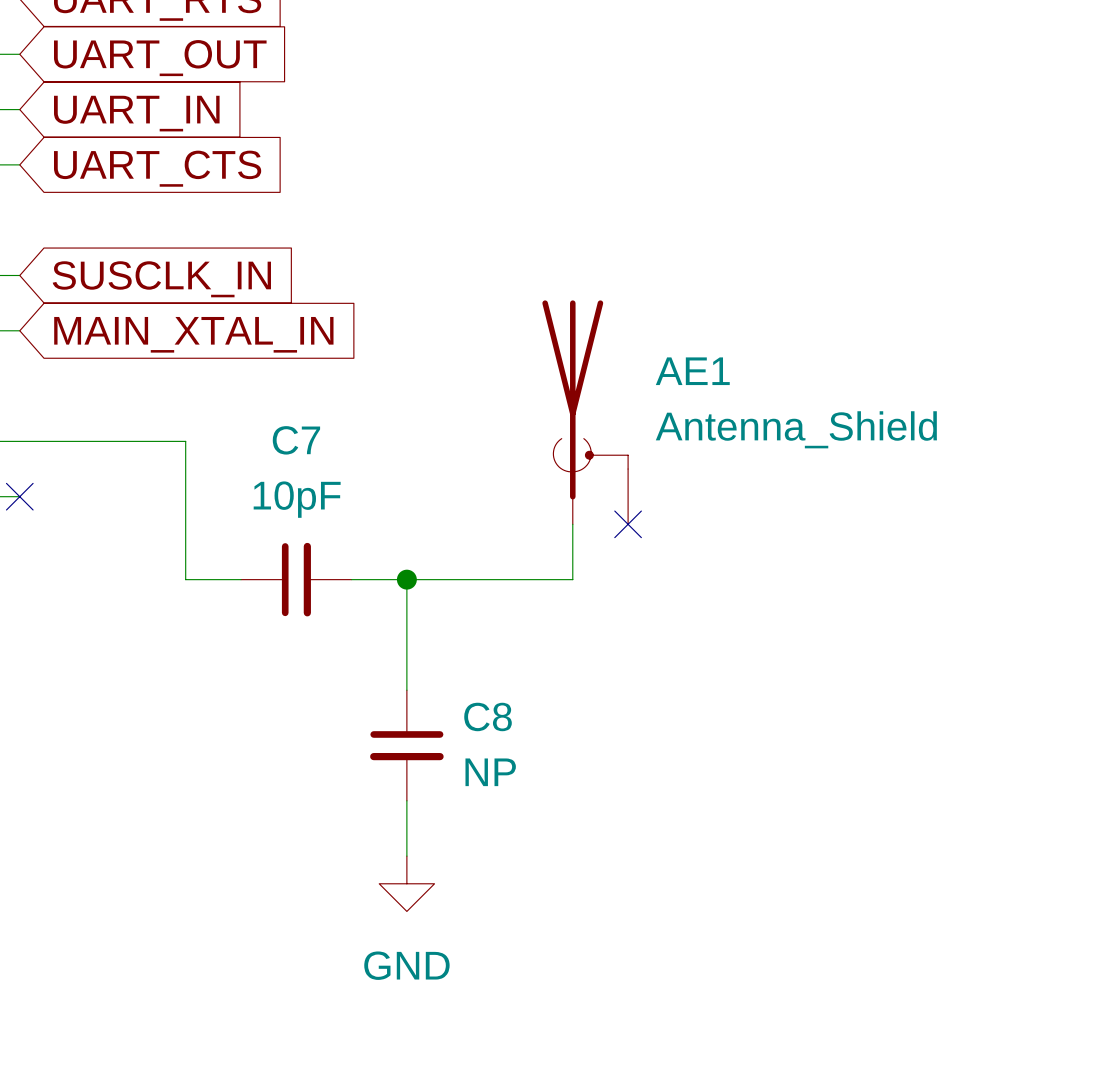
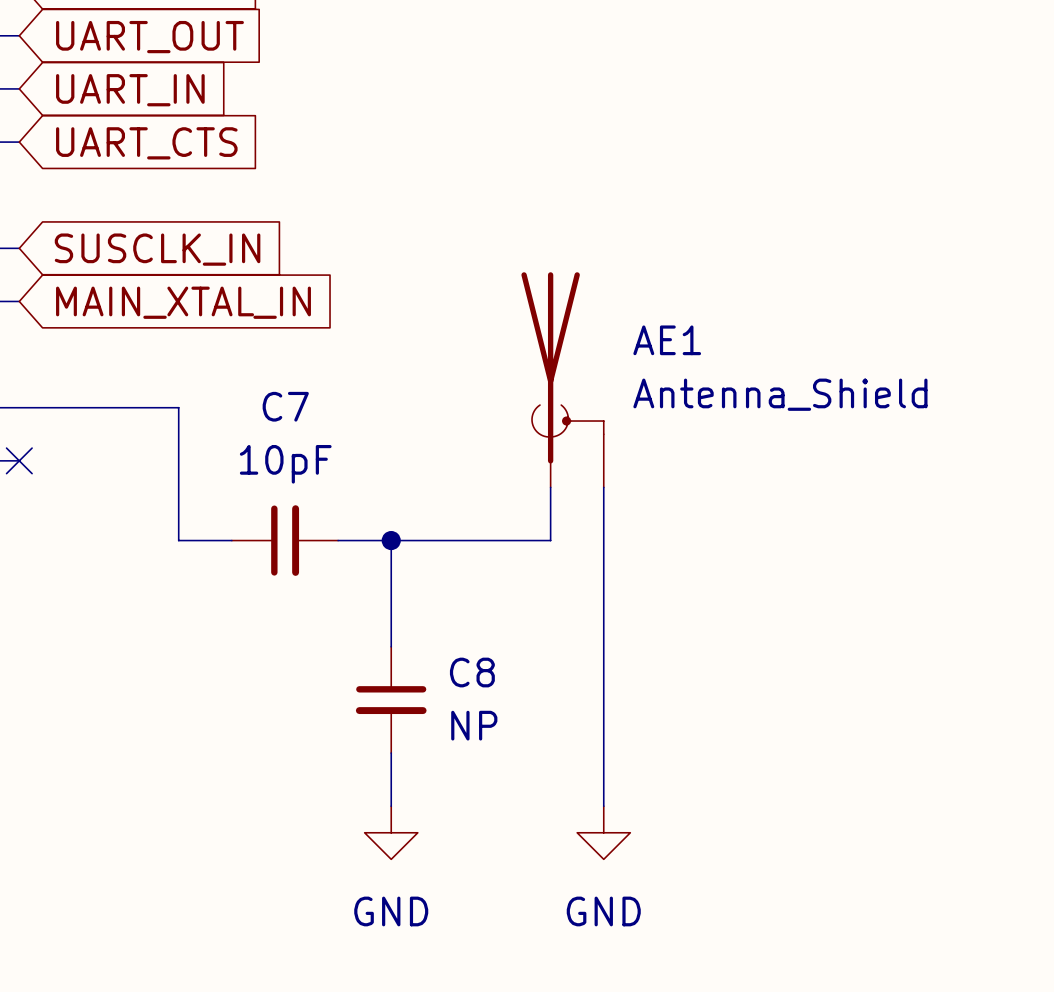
wire: none -> (603, 487) (603, 806)
no-connect mark: (628, 524) -> none
power symbol: none -> GND (603, 832)

